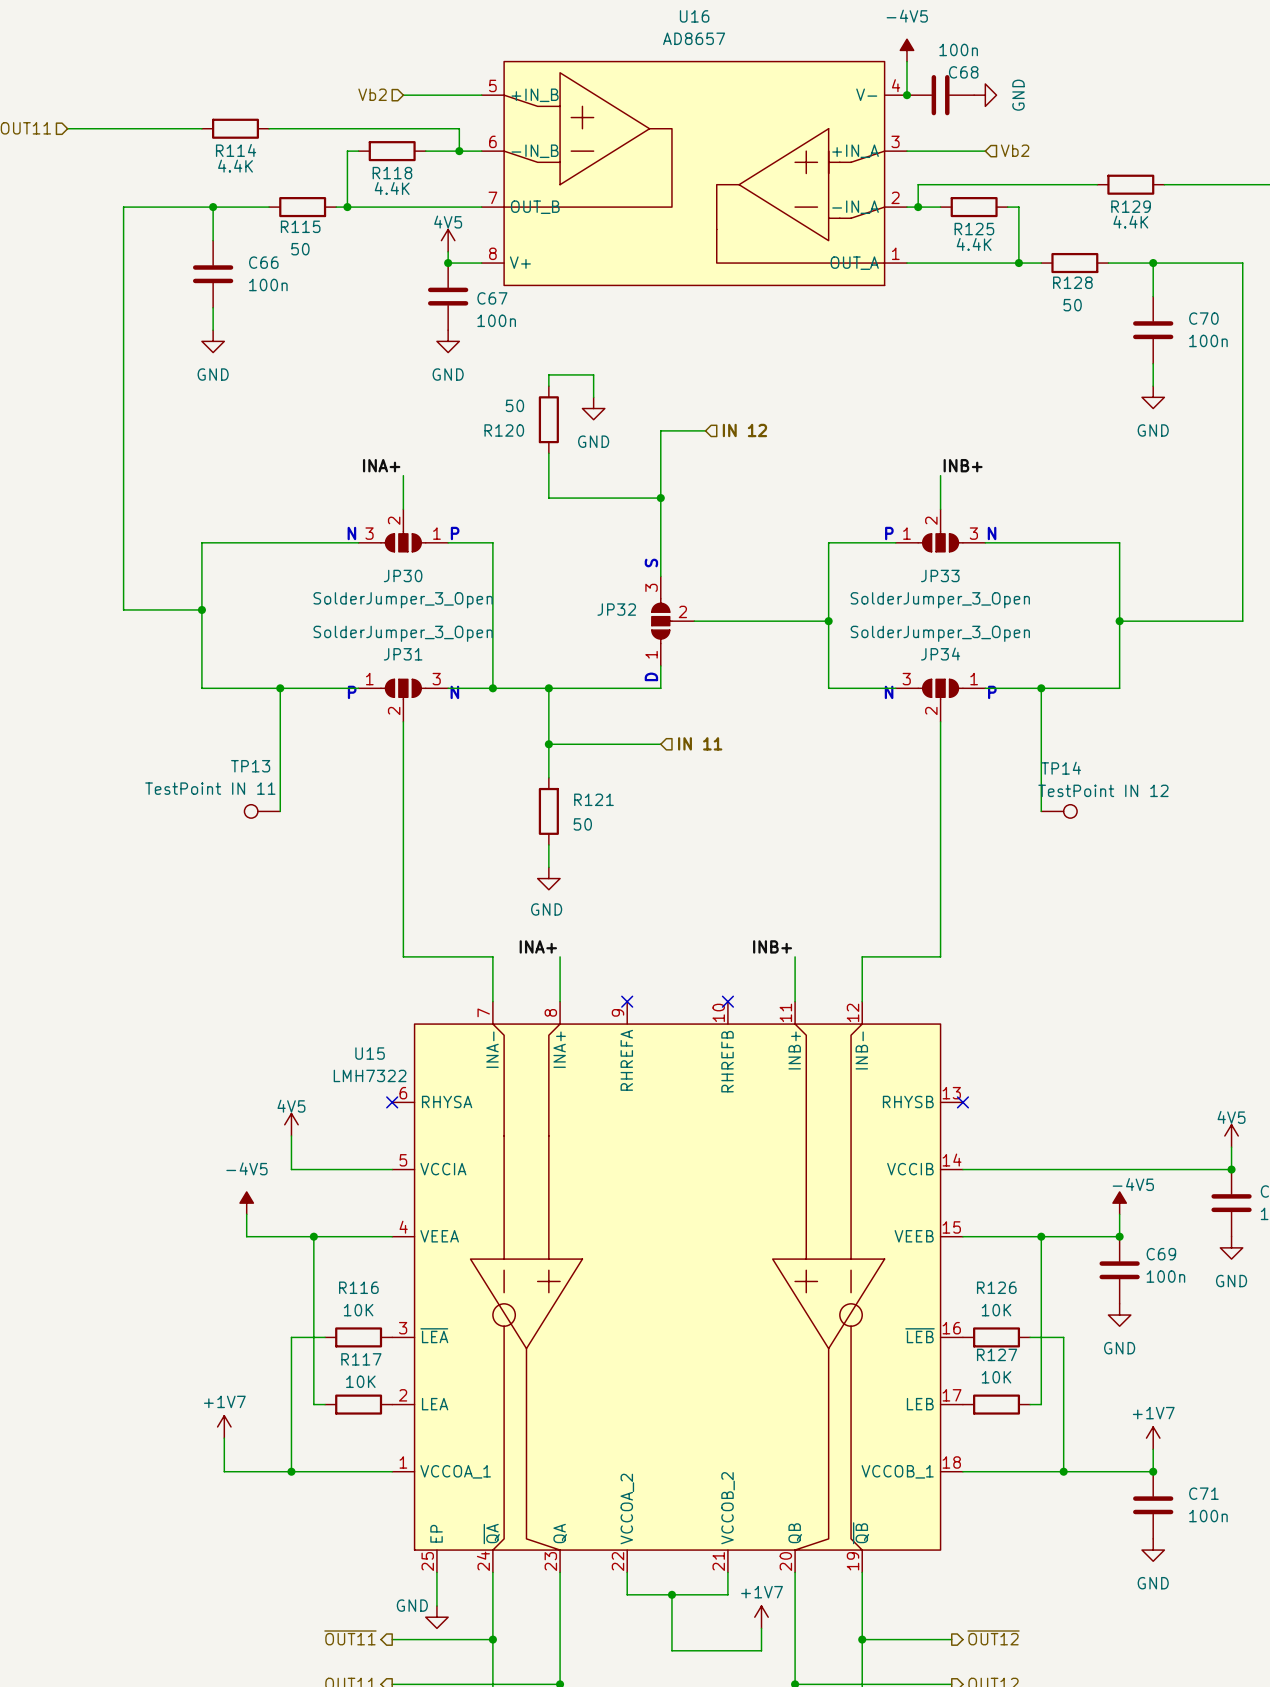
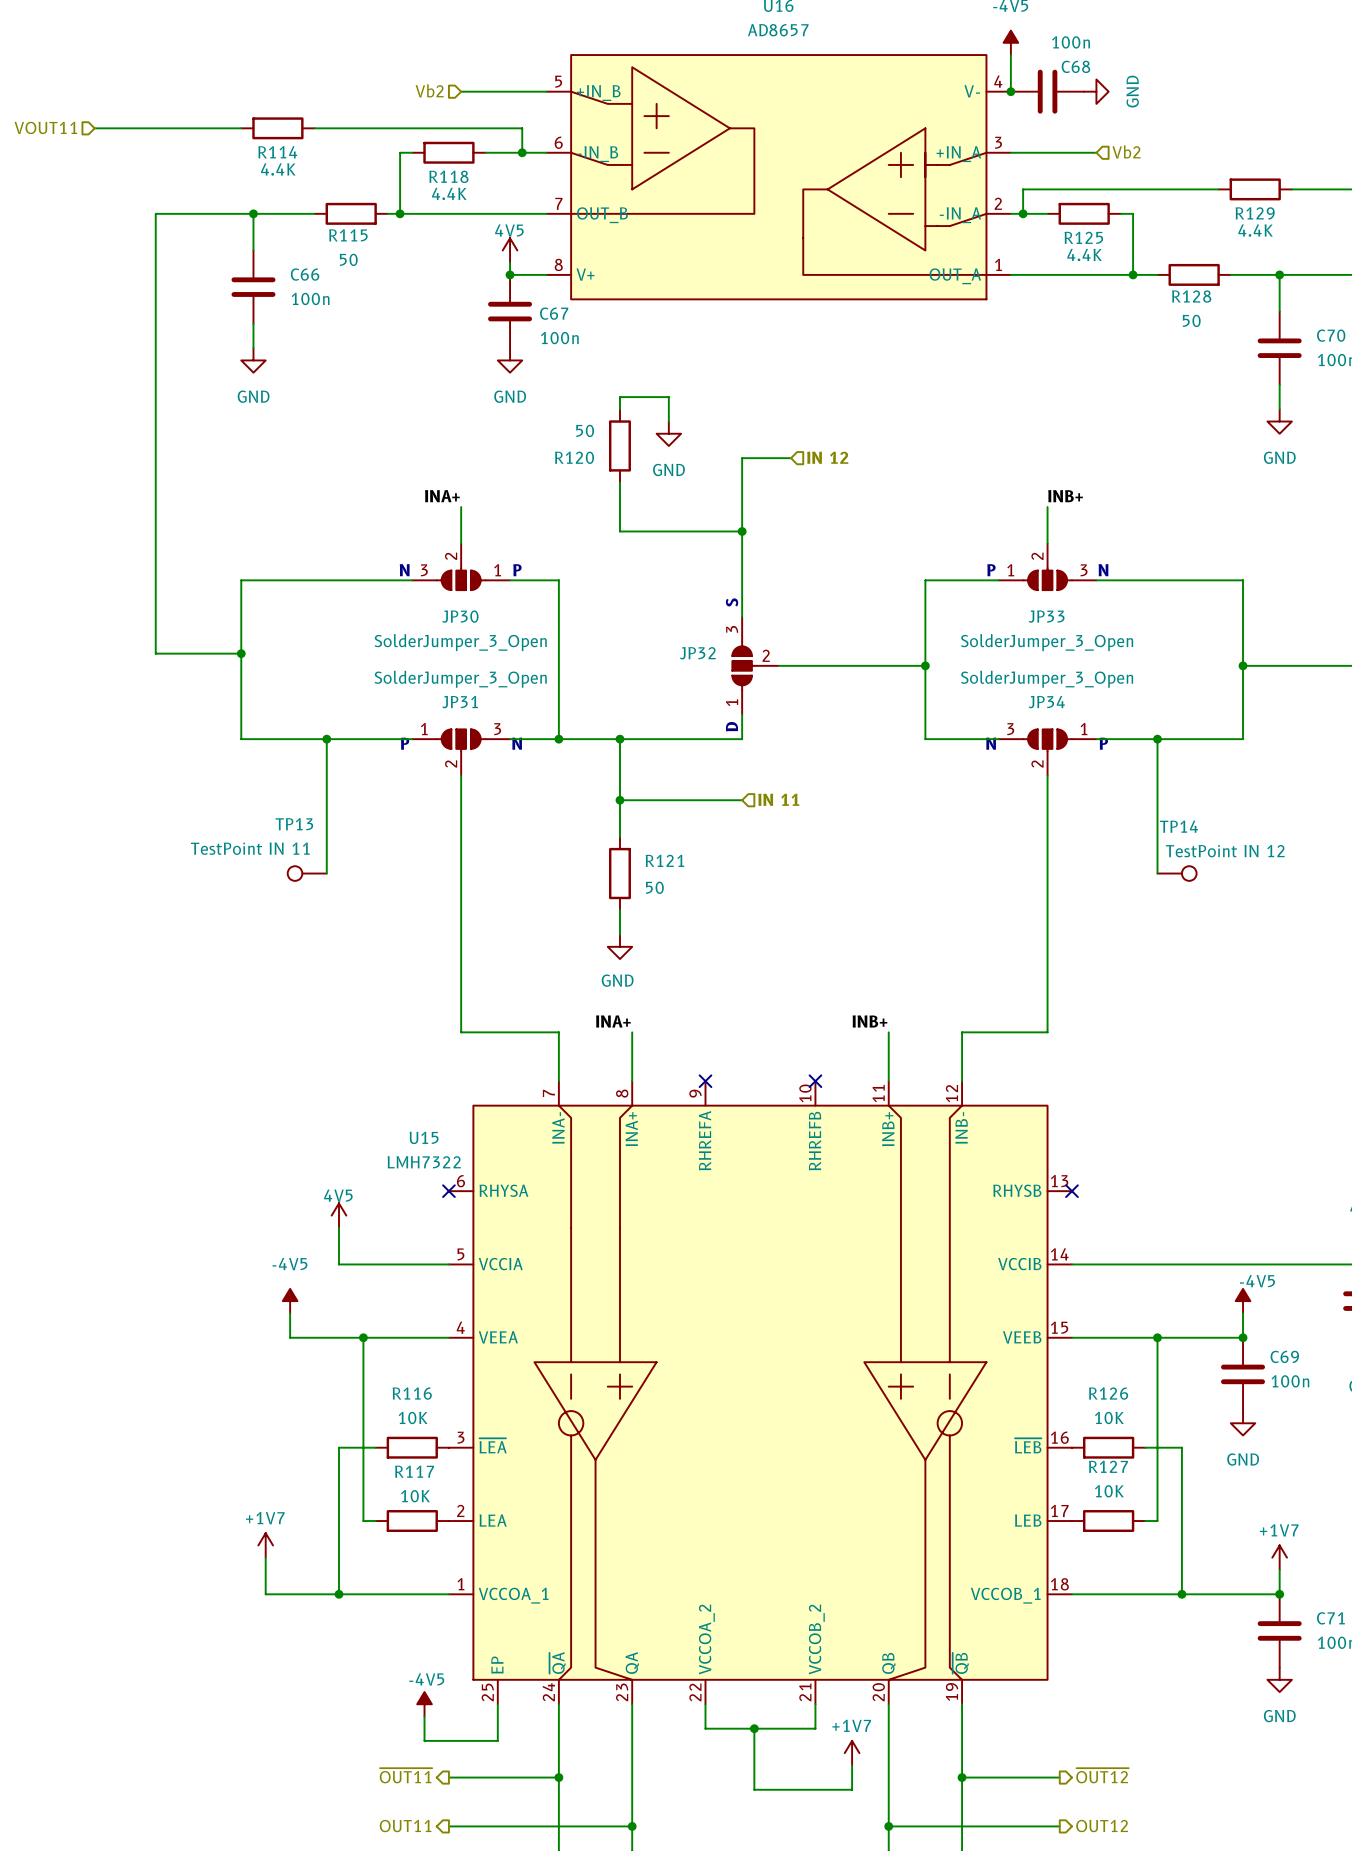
power symbol: none -> -4V5 (424, 1704)
wire: none -> (424, 1716) (424, 1740) (497, 1740)
power symbol: GND (436, 1617) -> none

